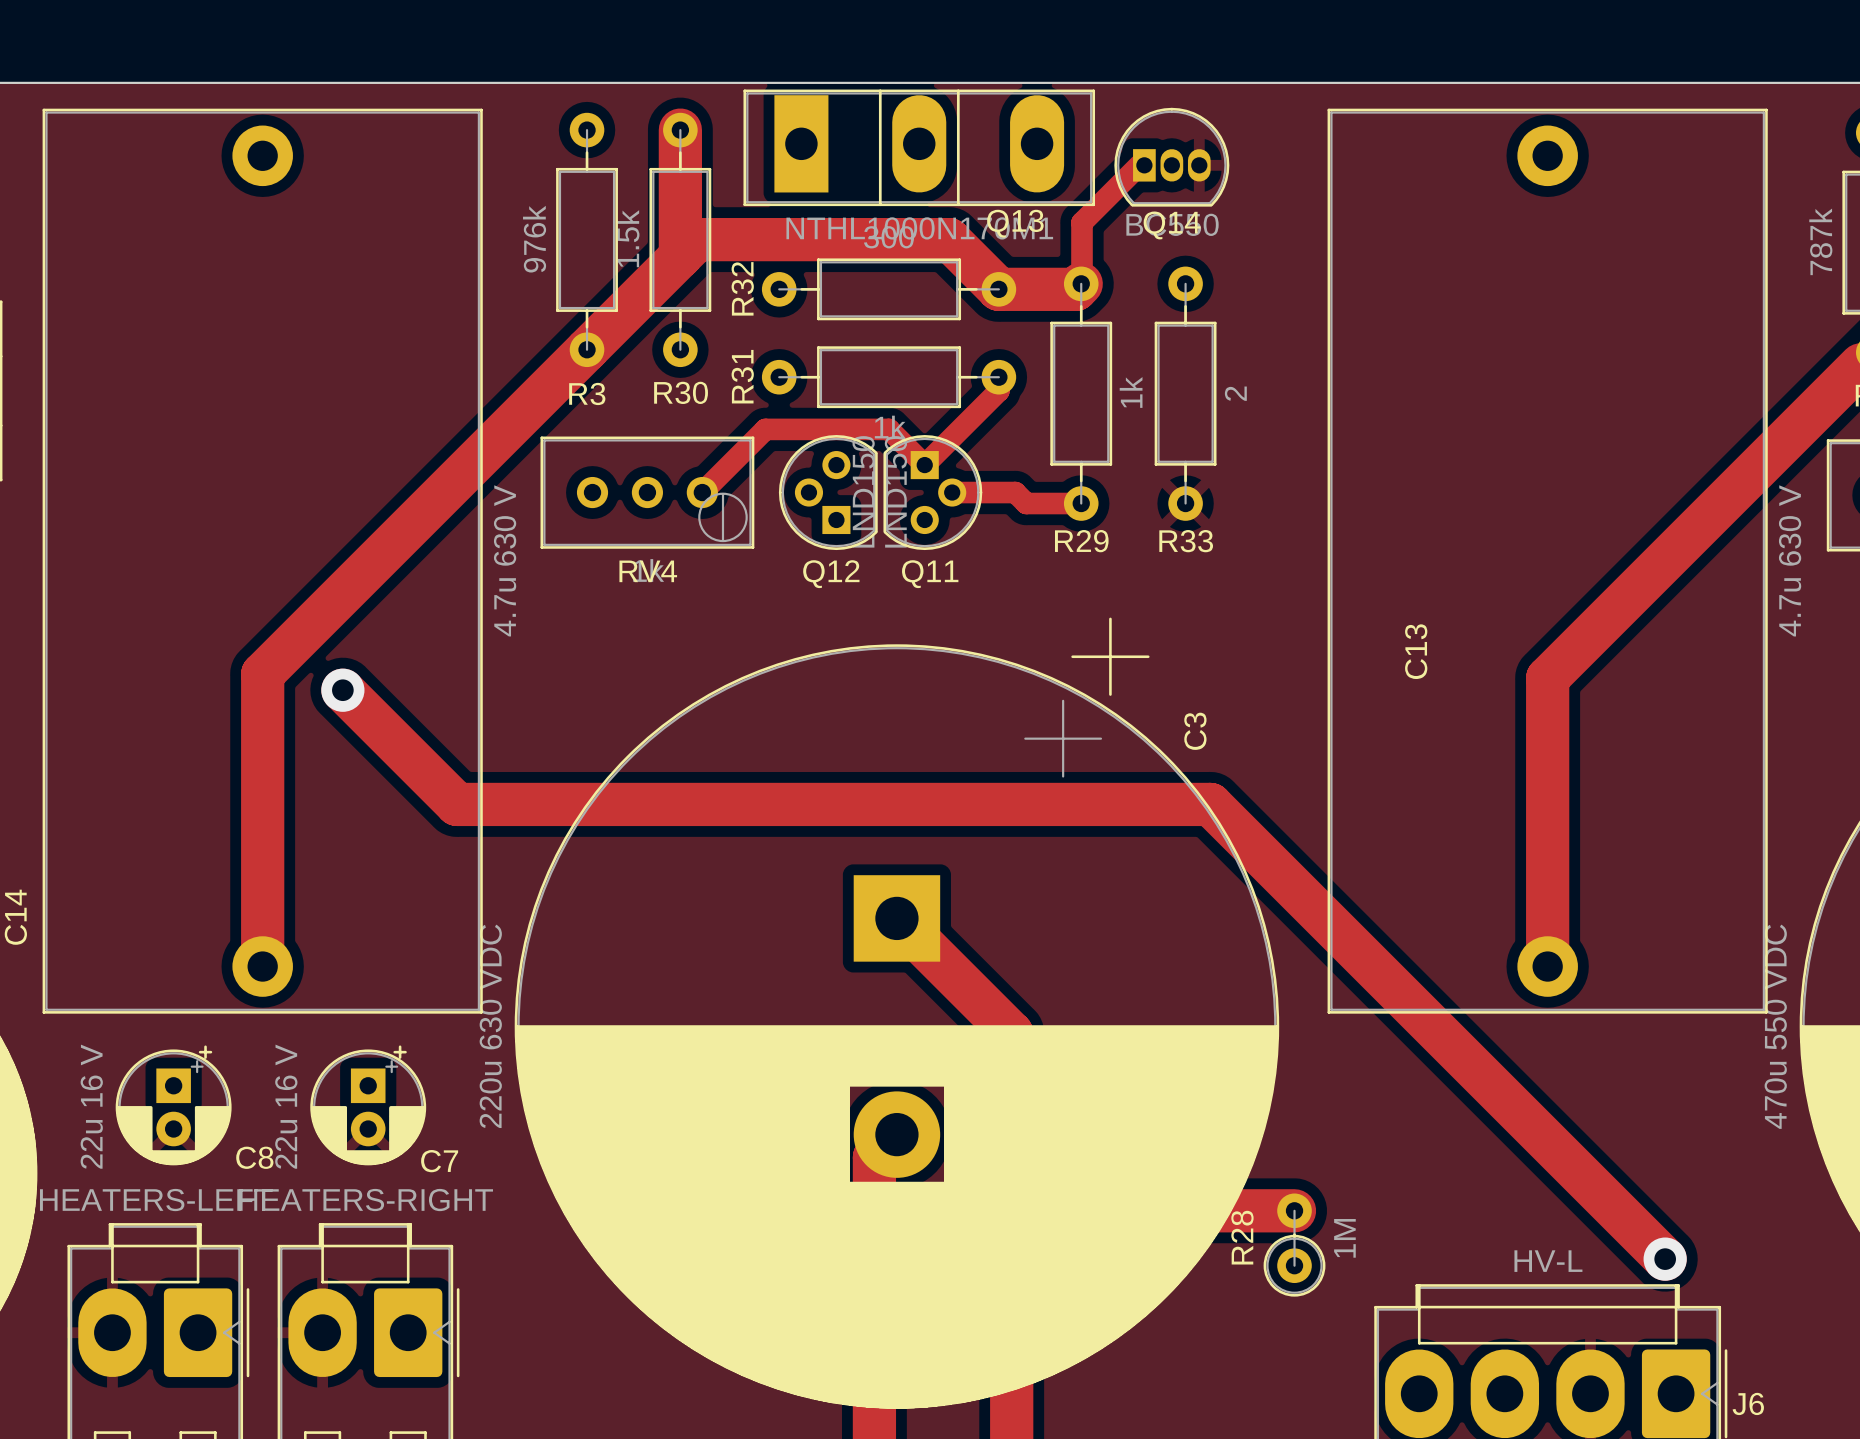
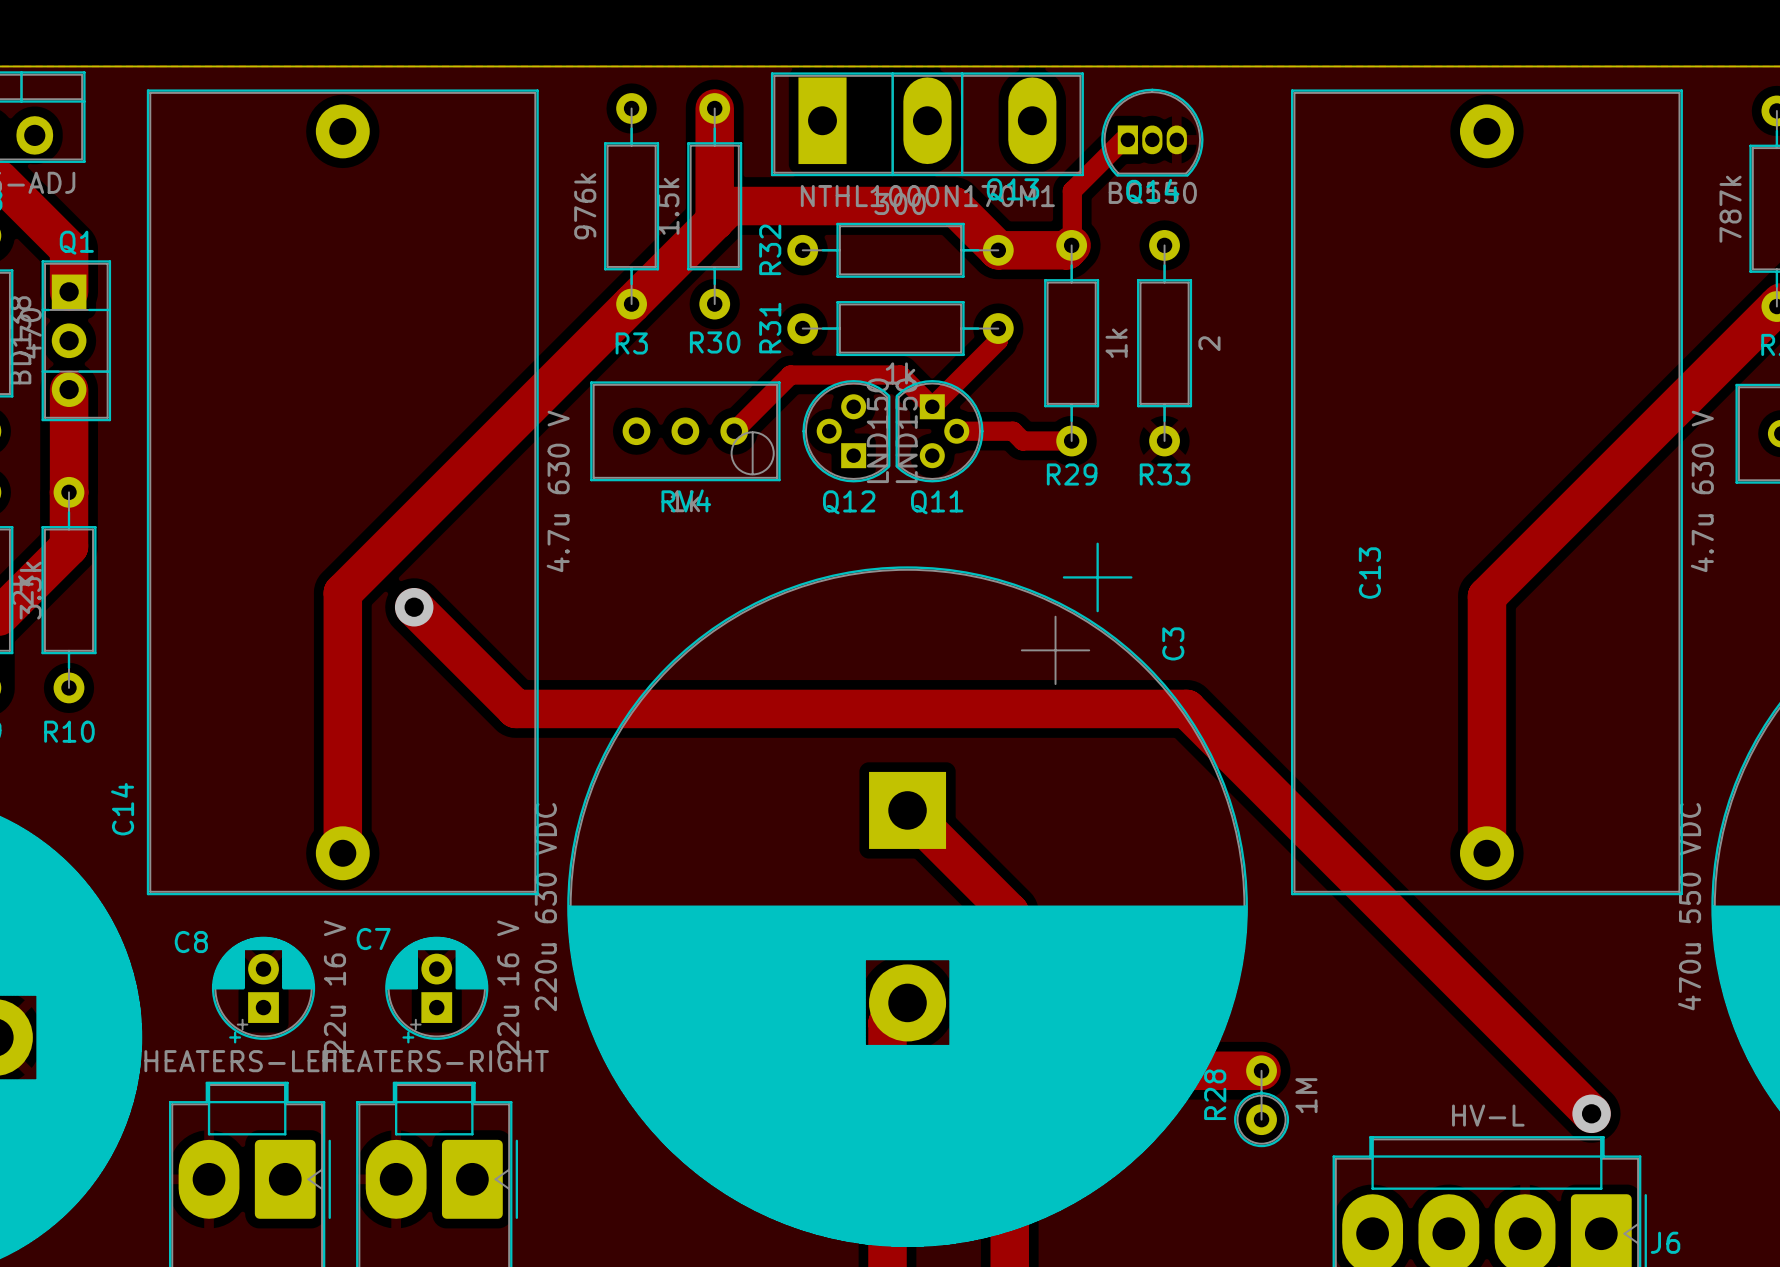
C8 rotation: 0° (173, 1105) -> 180° (263, 990)
C7 rotation: 0° (368, 1105) -> 180° (436, 990)

